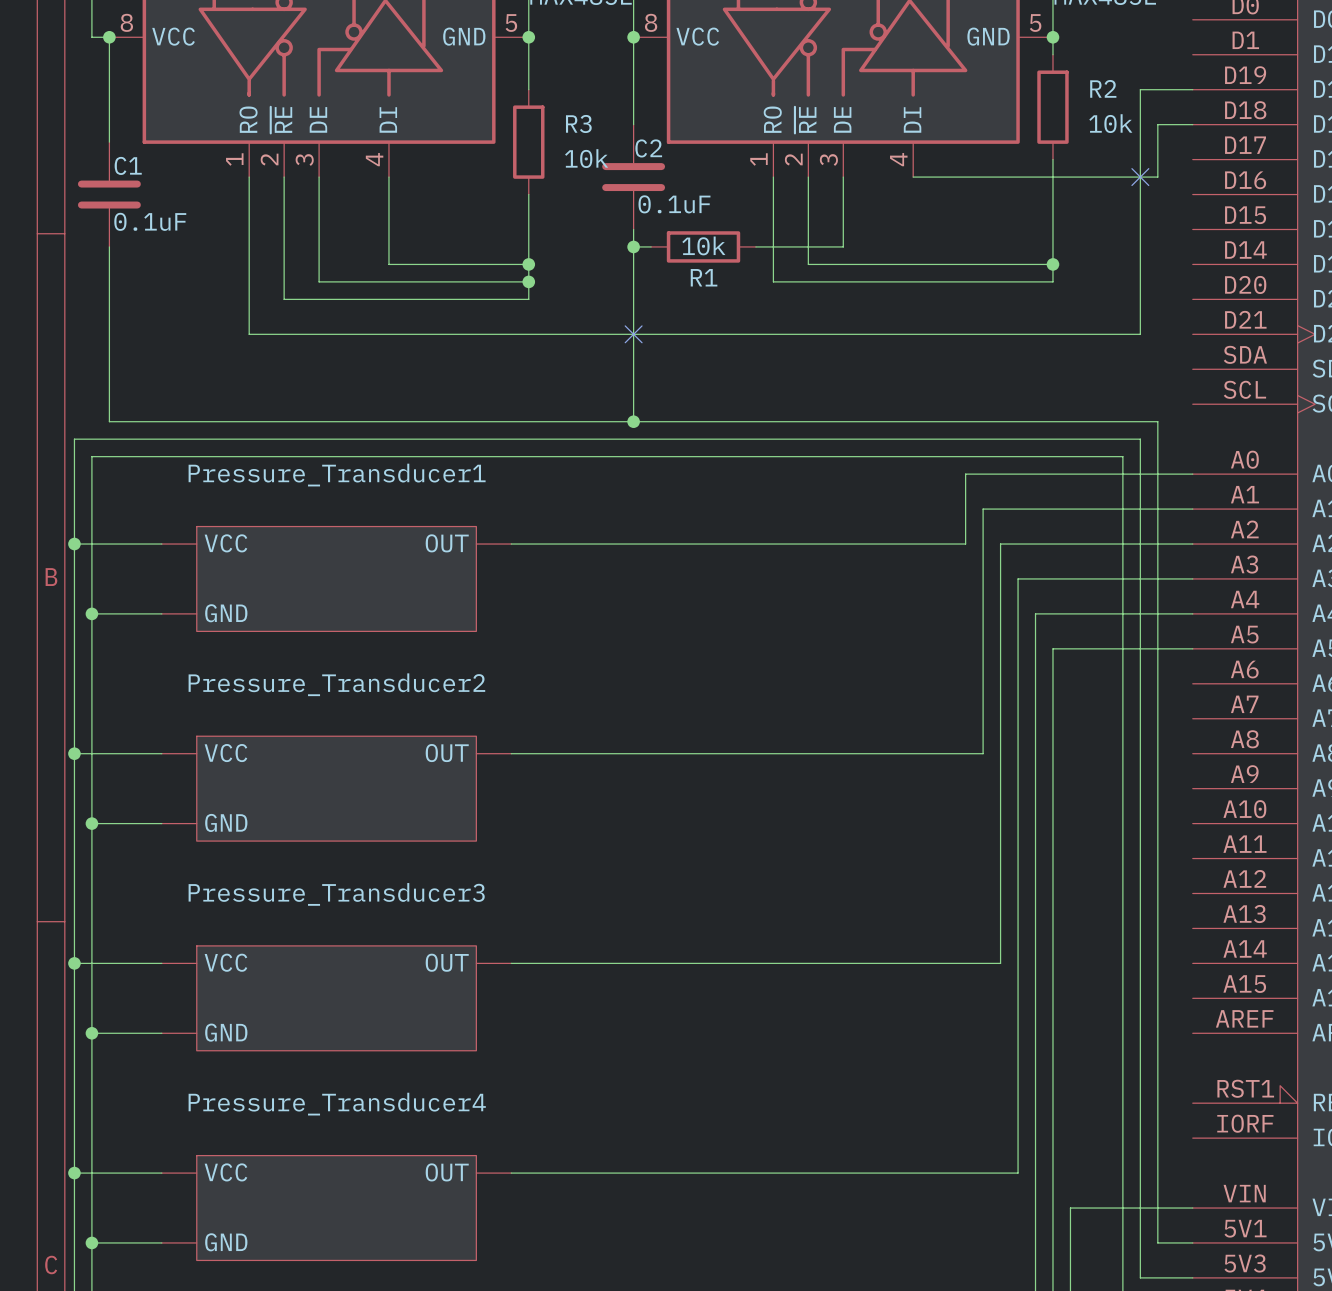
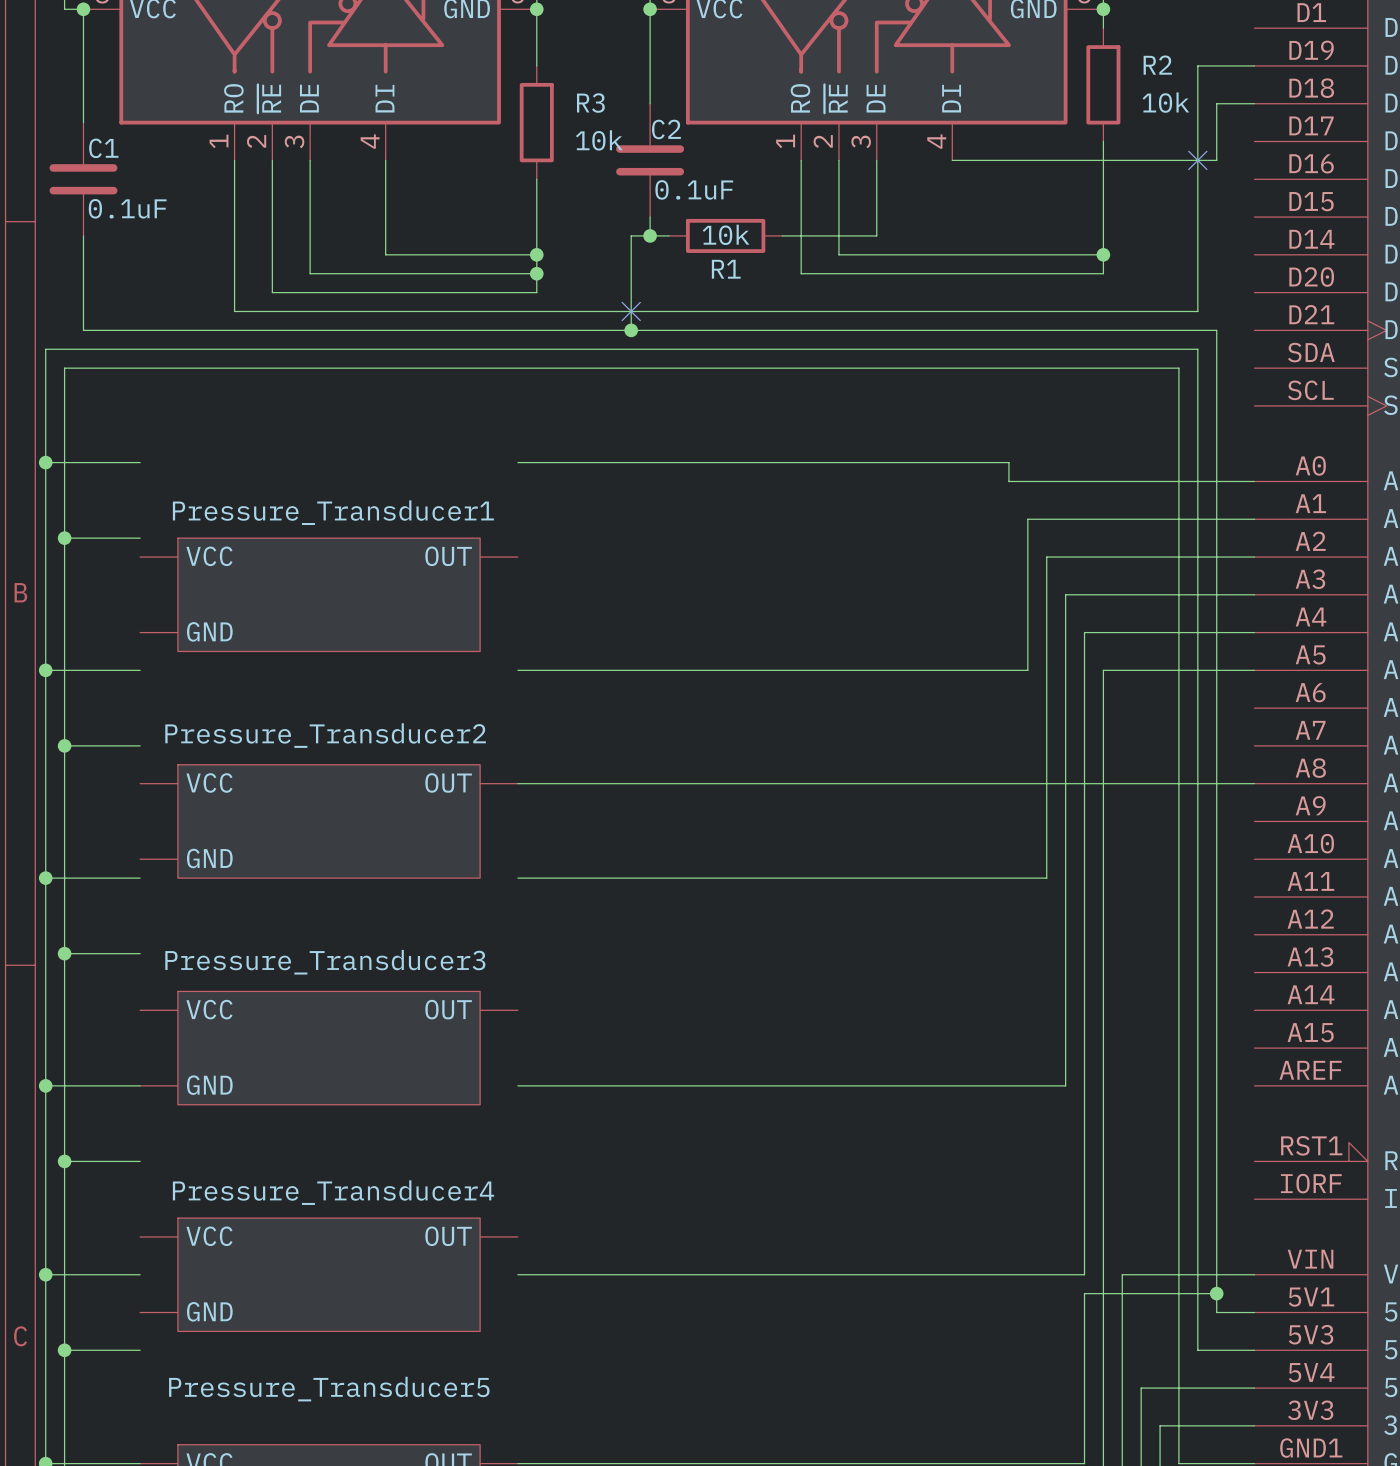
wire: (633, 246) (633, 421) -> (650, 235) (631, 235) (631, 330)
wire: (249, 316) (249, 334) -> (83, 330) (234, 330)
wire: none -> (234, 311) (1197, 311)
wire: (1140, 316) (1140, 334) -> (1216, 424) (1216, 330) (1197, 330)
wire: (109, 334) (109, 421) (1157, 421) -> none
junction: none -> (631, 330)
no-connect mark position: (633, 334) -> (631, 311)
junction: (633, 421) -> none
wire: (74, 439) (1140, 439) -> (45, 443) (45, 349) (1197, 349) (1197, 443)
wire: none -> (45, 462) (64, 462) (64, 368) (1178, 368) (1178, 462)
junction: none -> (45, 462)
wire: (161, 456) (511, 456) -> none
wire: (965, 456) (1122, 456) -> (1008, 462) (1008, 481)
wire: (965, 474) (965, 544) (511, 544) -> none
Pressure_Transducer1 name position: Pressure_Transducer1 (337, 475) -> Pressure_Transducer1 (333, 512)
wire: none -> (64, 538) (140, 538)
wire: (74, 544) (161, 544) -> (45, 670) (140, 670)
junction position: (74, 544) -> (64, 538)
wire: (91, 613) (161, 613) -> (64, 745) (140, 745)
junction position: (91, 613) -> (45, 670)
wire: none -> (517, 670) (1027, 670)
wire: (983, 648) (983, 753) -> (1254, 783) (1027, 783)
Pressure_Transducer2 name position: Pressure_Transducer2 (336, 684) -> Pressure_Transducer2 (325, 735)
wire: (74, 753) (161, 753) -> (45, 878) (140, 878)
junction position: (74, 753) -> (64, 745)
wire: (91, 823) (161, 823) -> (64, 953) (140, 953)
junction position: (91, 823) -> (45, 878)
wire: (1000, 841) (1000, 963) (511, 963) -> (1046, 878) (517, 878)
Pressure_Transducer3 name position: Pressure_Transducer3 (336, 894) -> Pressure_Transducer3 (325, 962)
junction: none -> (64, 953)
wire: (74, 963) (161, 963) -> none
junction: (74, 963) -> none
wire: none -> (45, 1085) (64, 1085)
junction position: (91, 1033) -> (45, 1085)
wire: (1018, 1033) (1018, 1173) (511, 1173) -> (1065, 1085) (517, 1085)
wire: none -> (64, 1161) (140, 1161)
junction: none -> (64, 1161)
Pressure_Transducer4 name position: Pressure_Transducer4 (337, 1104) -> Pressure_Transducer4 (333, 1192)
wire: (74, 1173) (161, 1173) -> (45, 1274) (140, 1274)
junction: (74, 1173) -> none
junction: none -> (45, 1274)
wire: none -> (517, 1274) (1084, 1274)
wire: (1035, 1208) (1035, 1225) -> (1216, 1293) (1084, 1293)
junction: none -> (1216, 1293)
wire: (91, 1242) (161, 1242) -> (64, 1350) (140, 1350)
junction: (91, 1242) -> none
junction: none -> (64, 1350)

